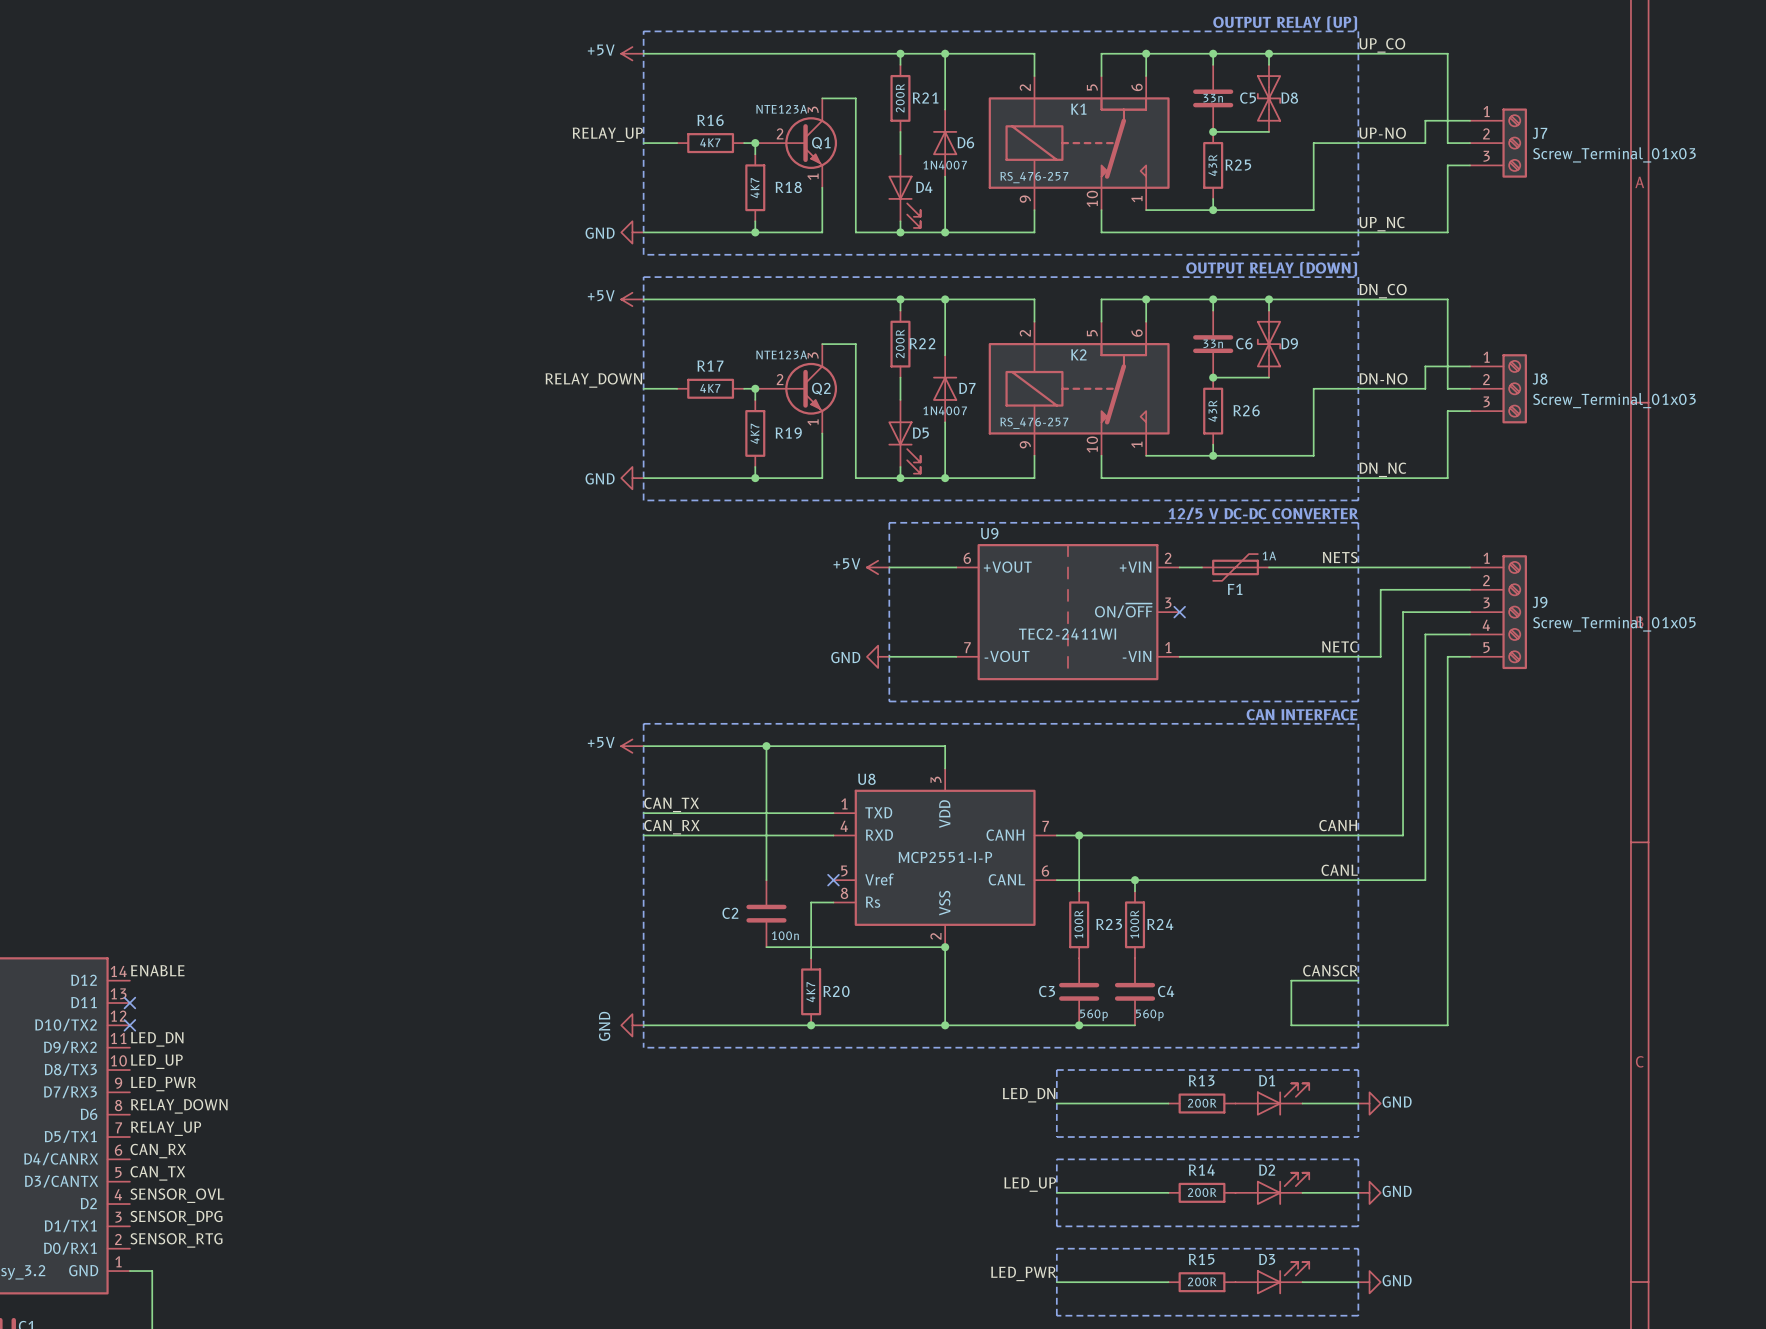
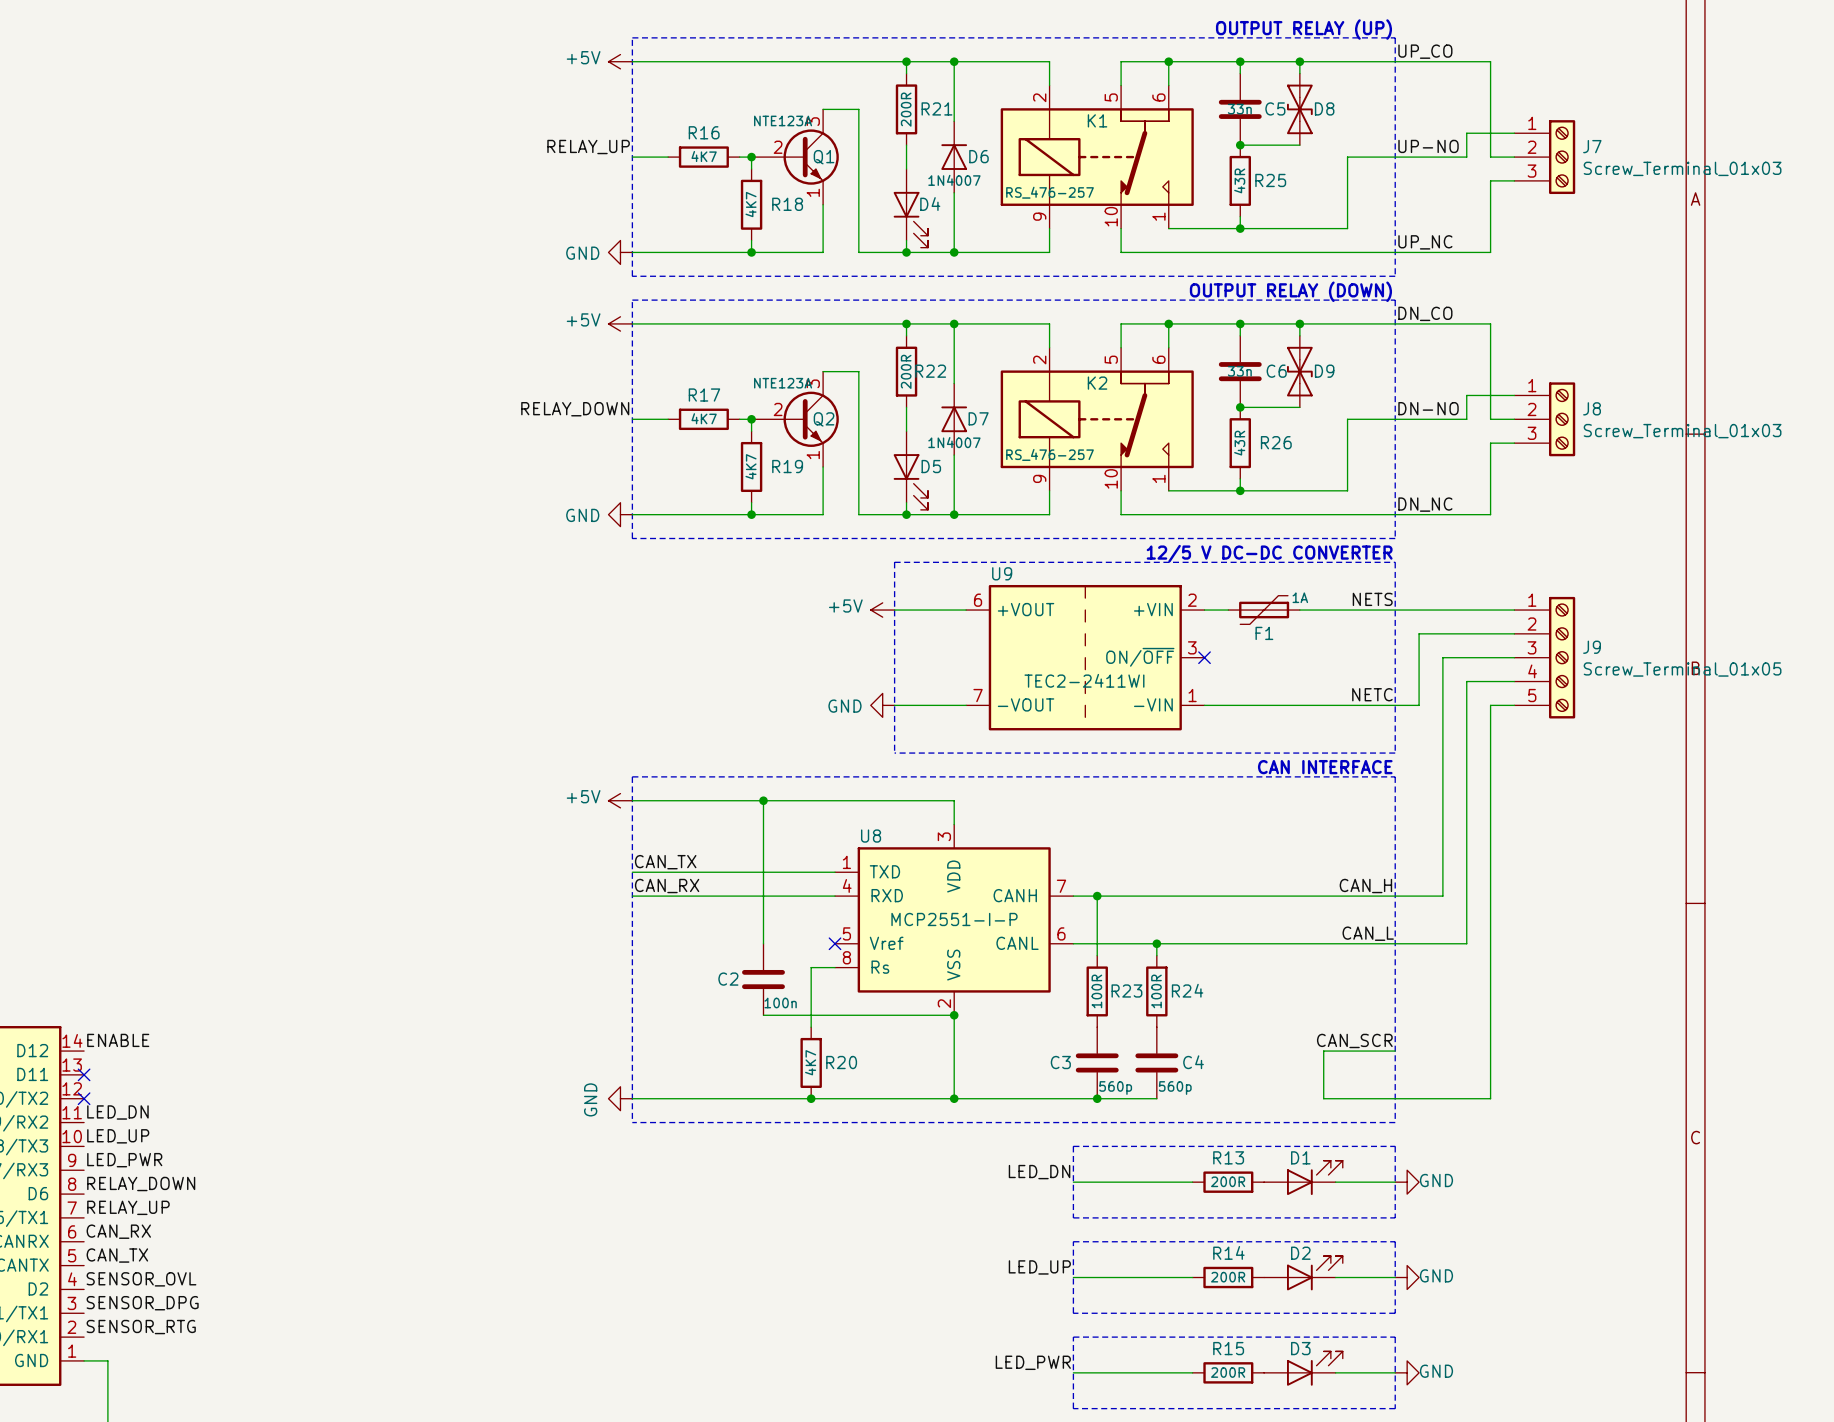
label: CANH (1338, 825) -> CAN_H (1365, 886)
label: CANL (1339, 870) -> CAN_L (1368, 933)
label: CANSCR (1330, 970) -> CAN_SCR (1354, 1040)

